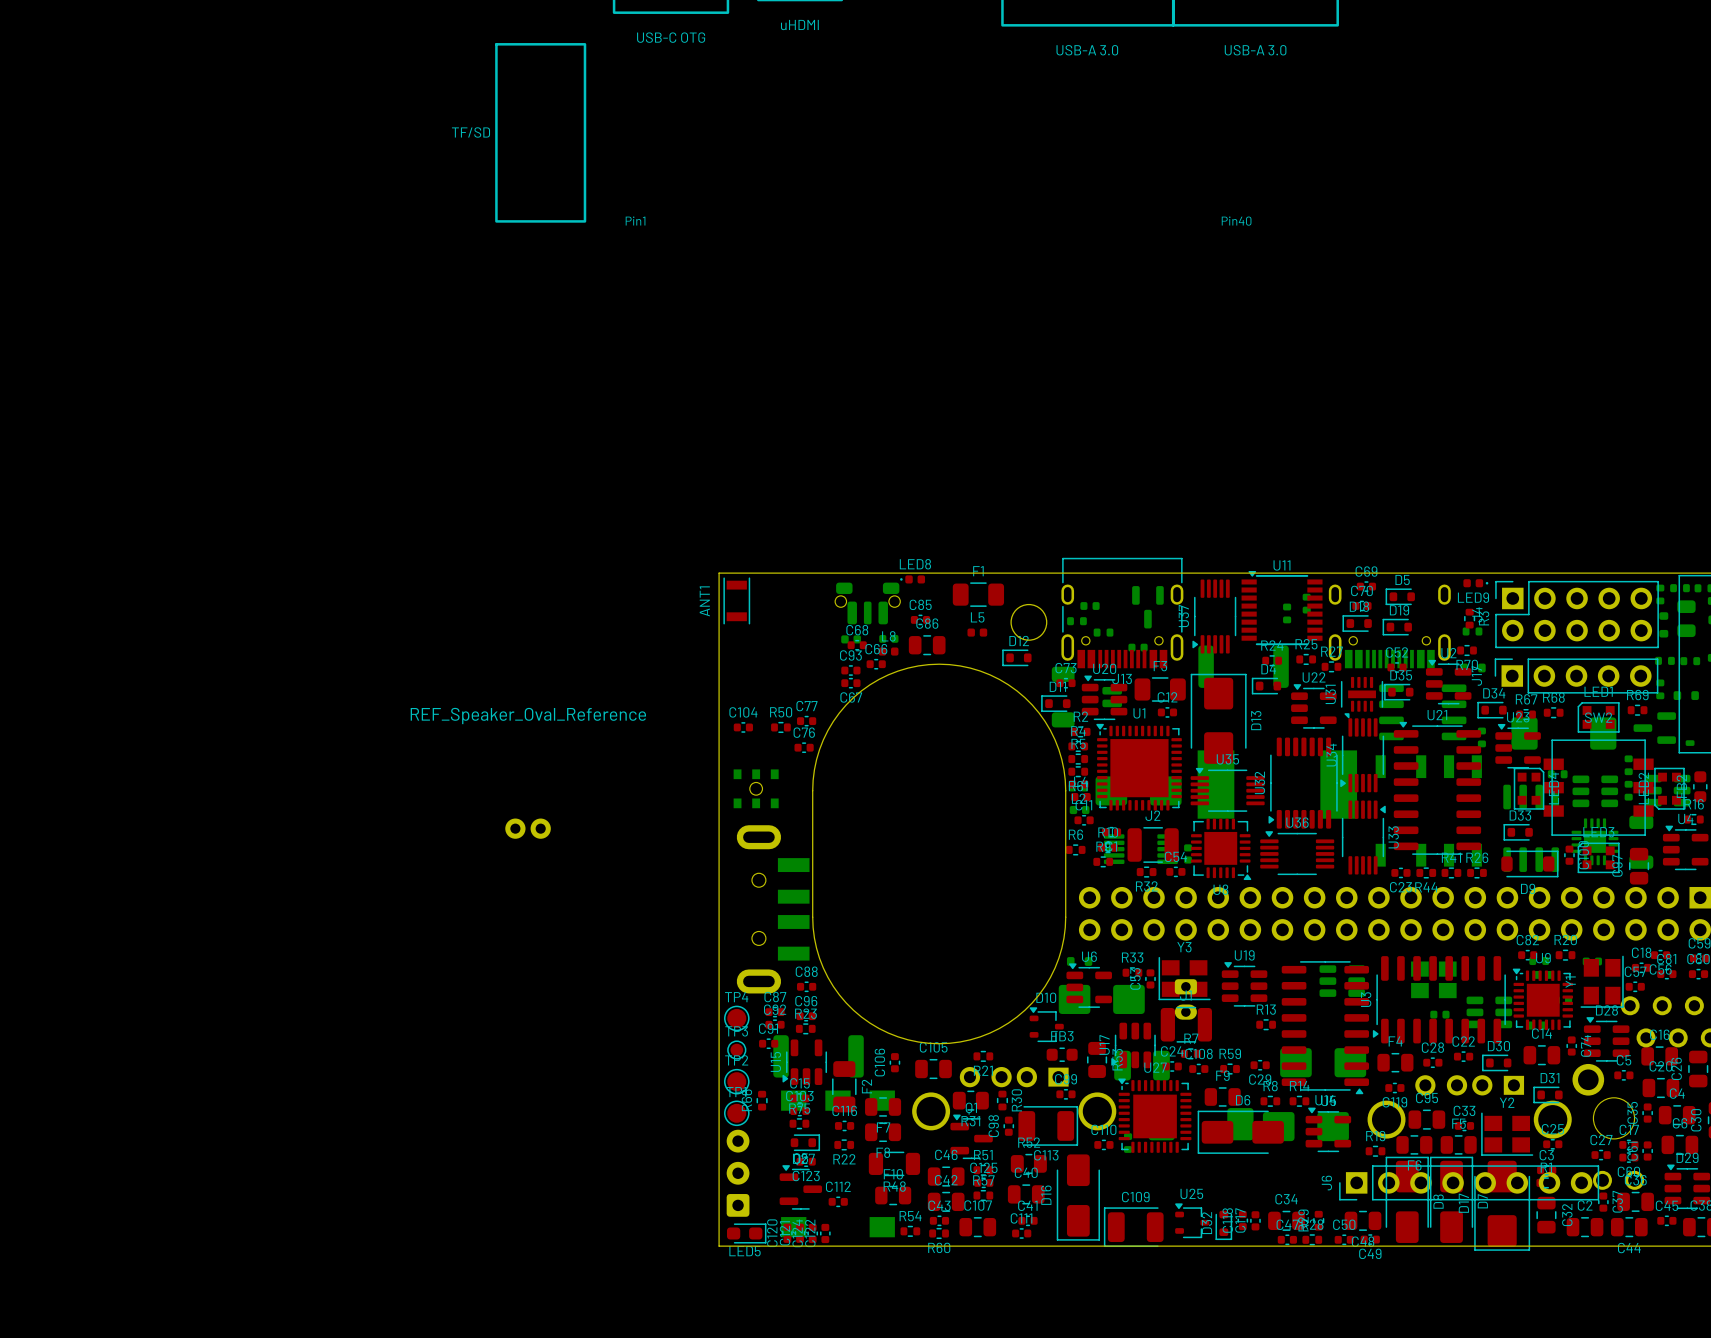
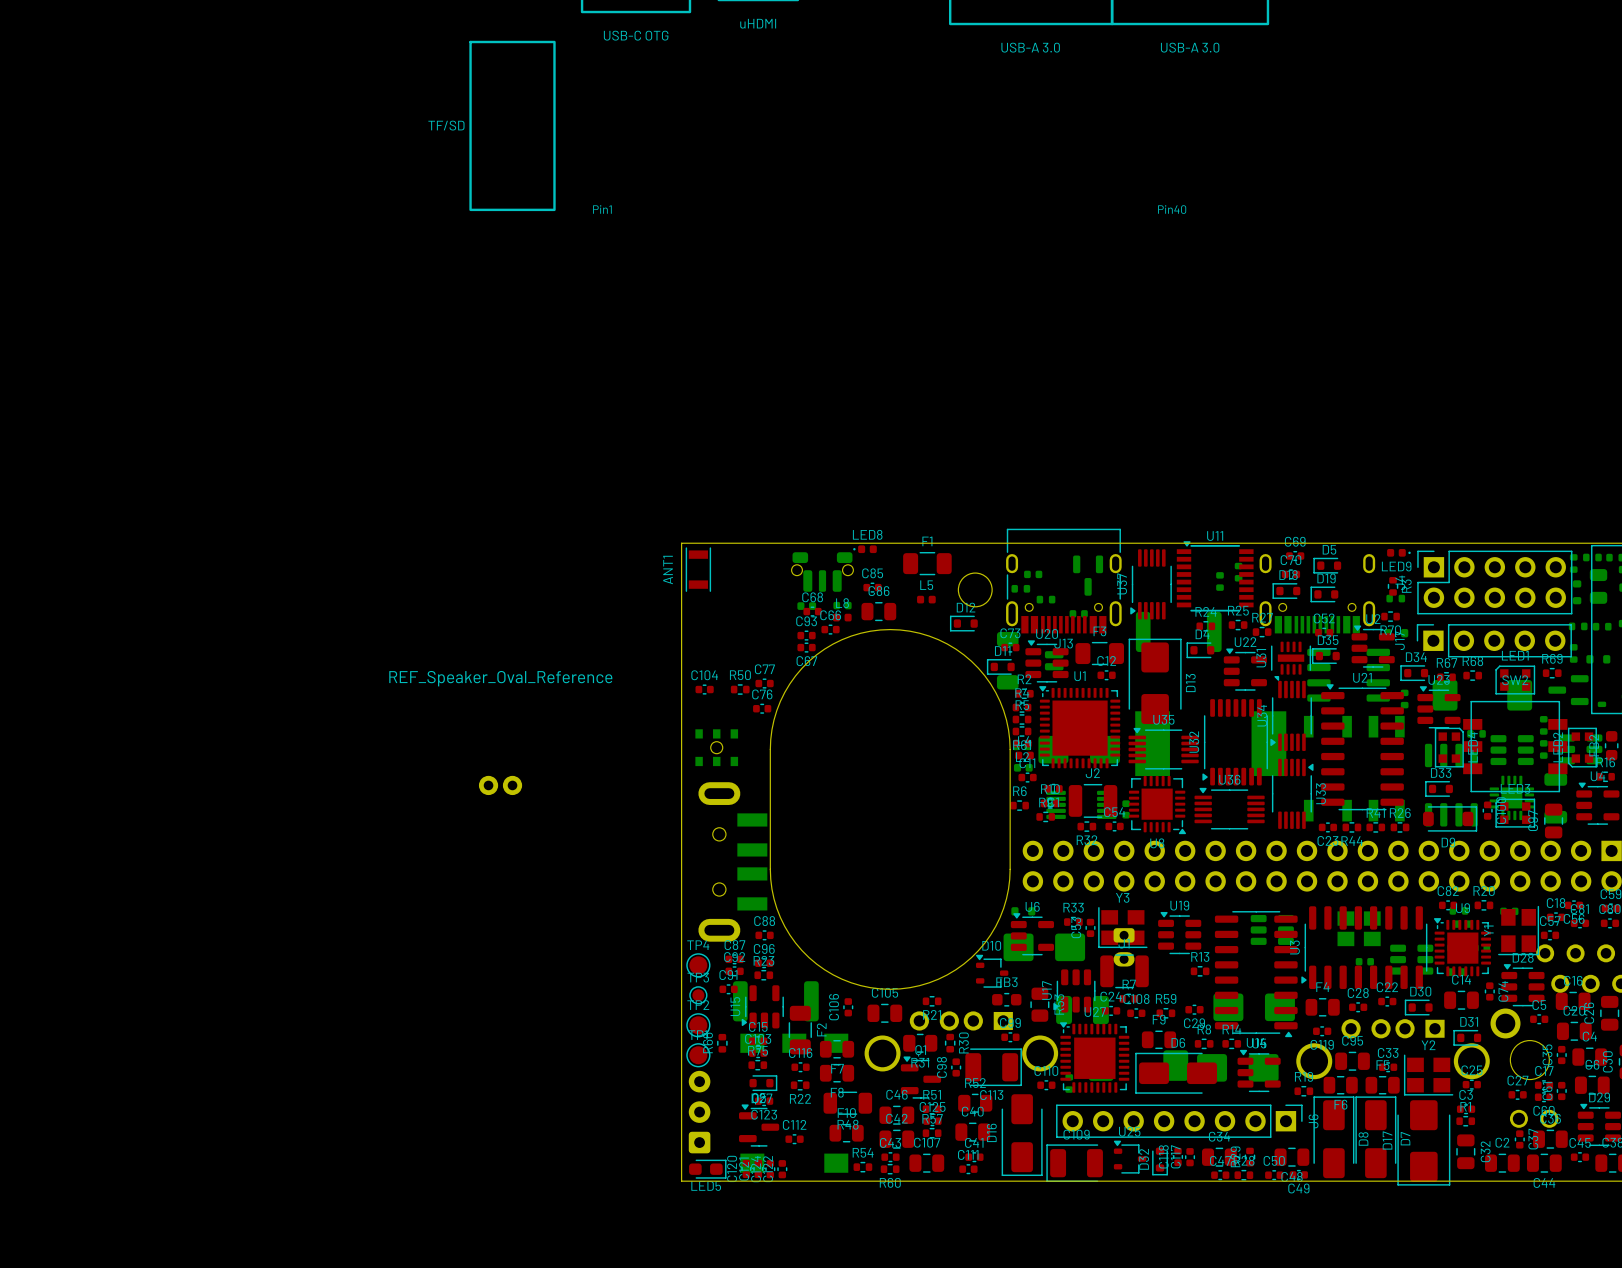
J6 rotation: 0° (1469, 1182) -> 180° (1179, 1121)
J6 position: (1469, 1182) -> (1179, 1121)

